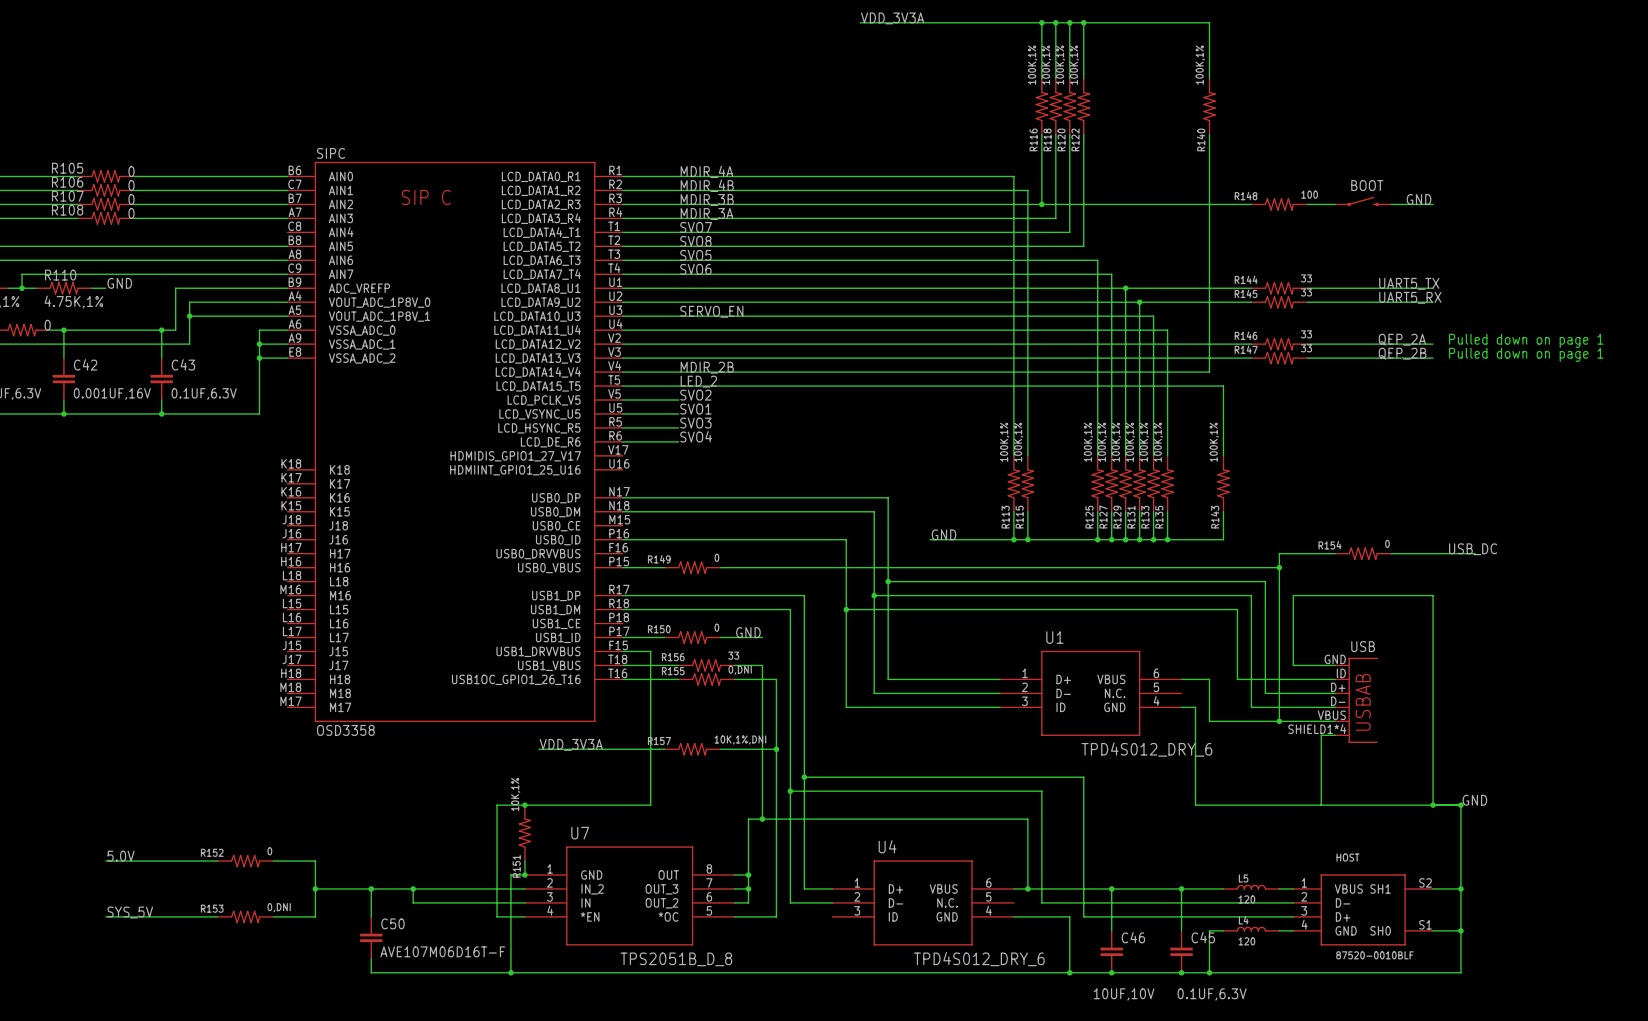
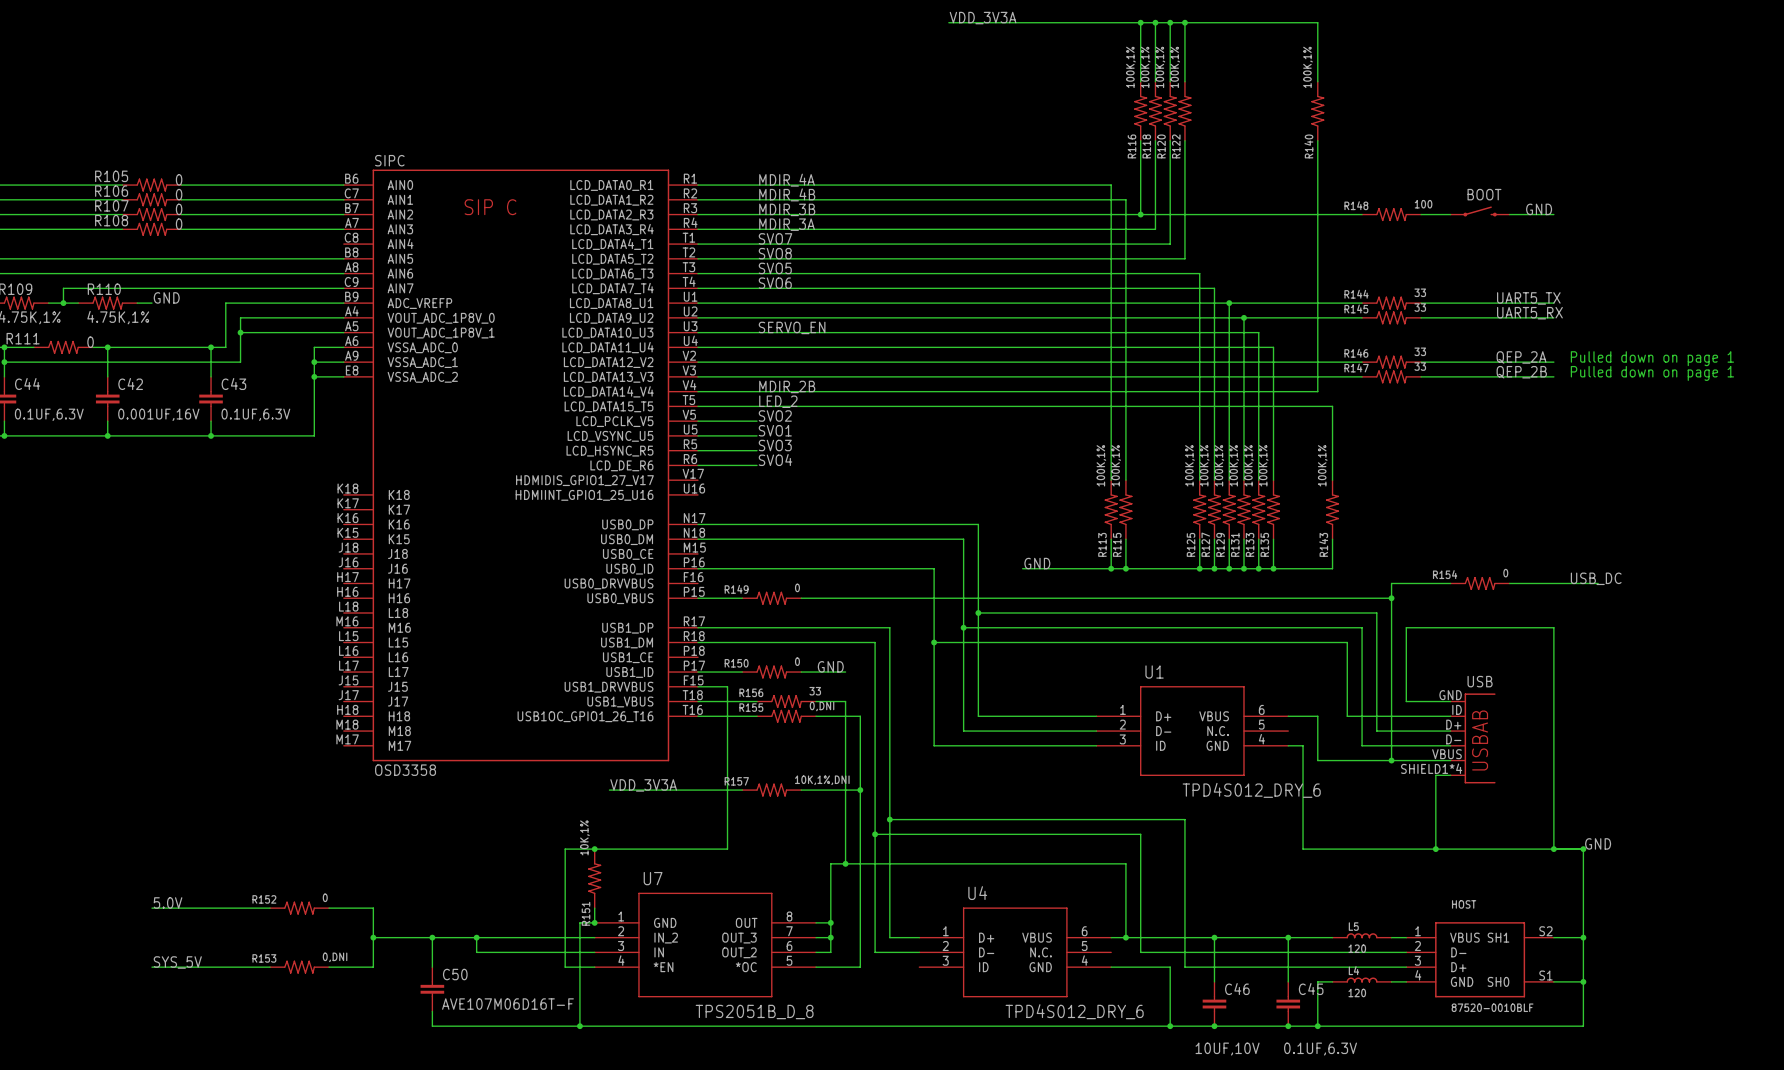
junction: none -> (1435, 849)

